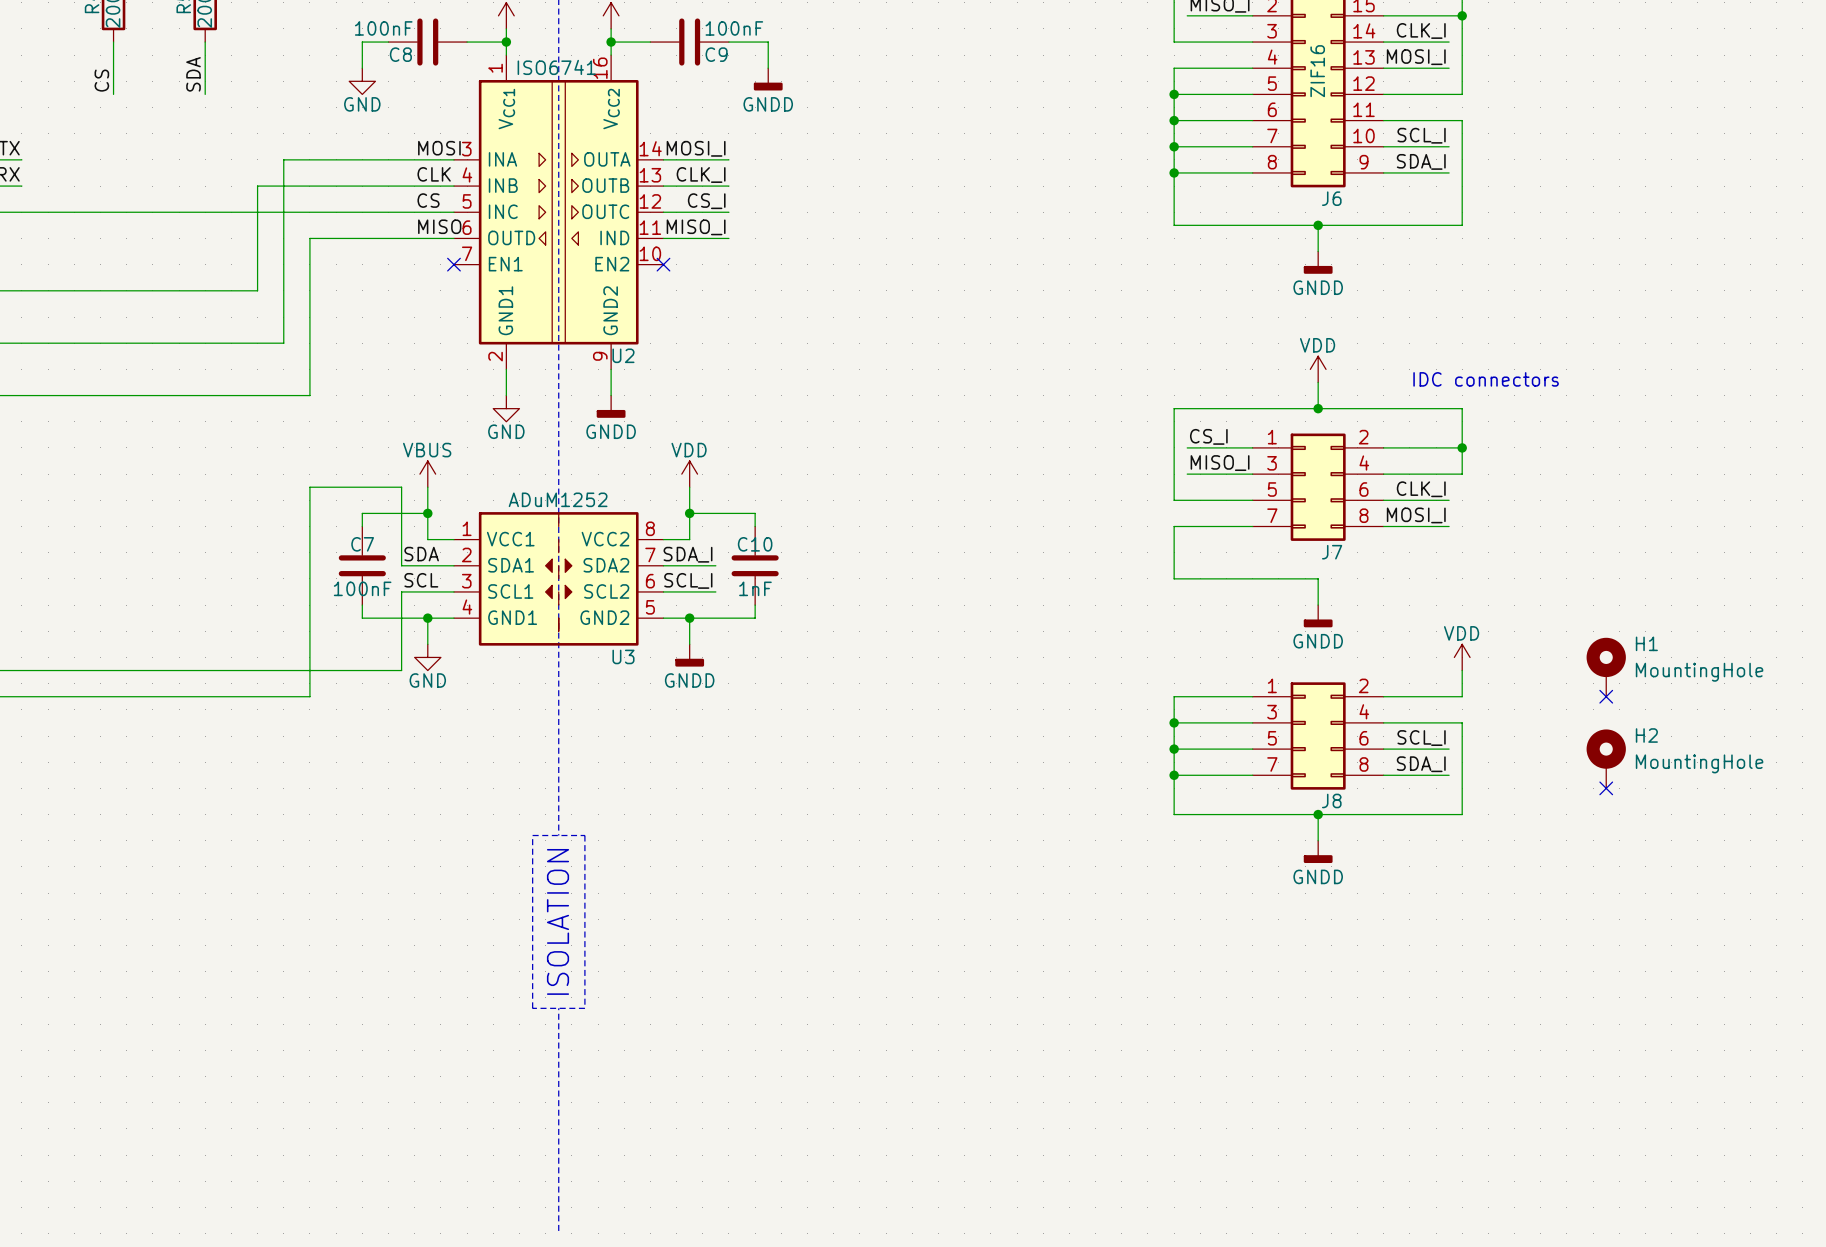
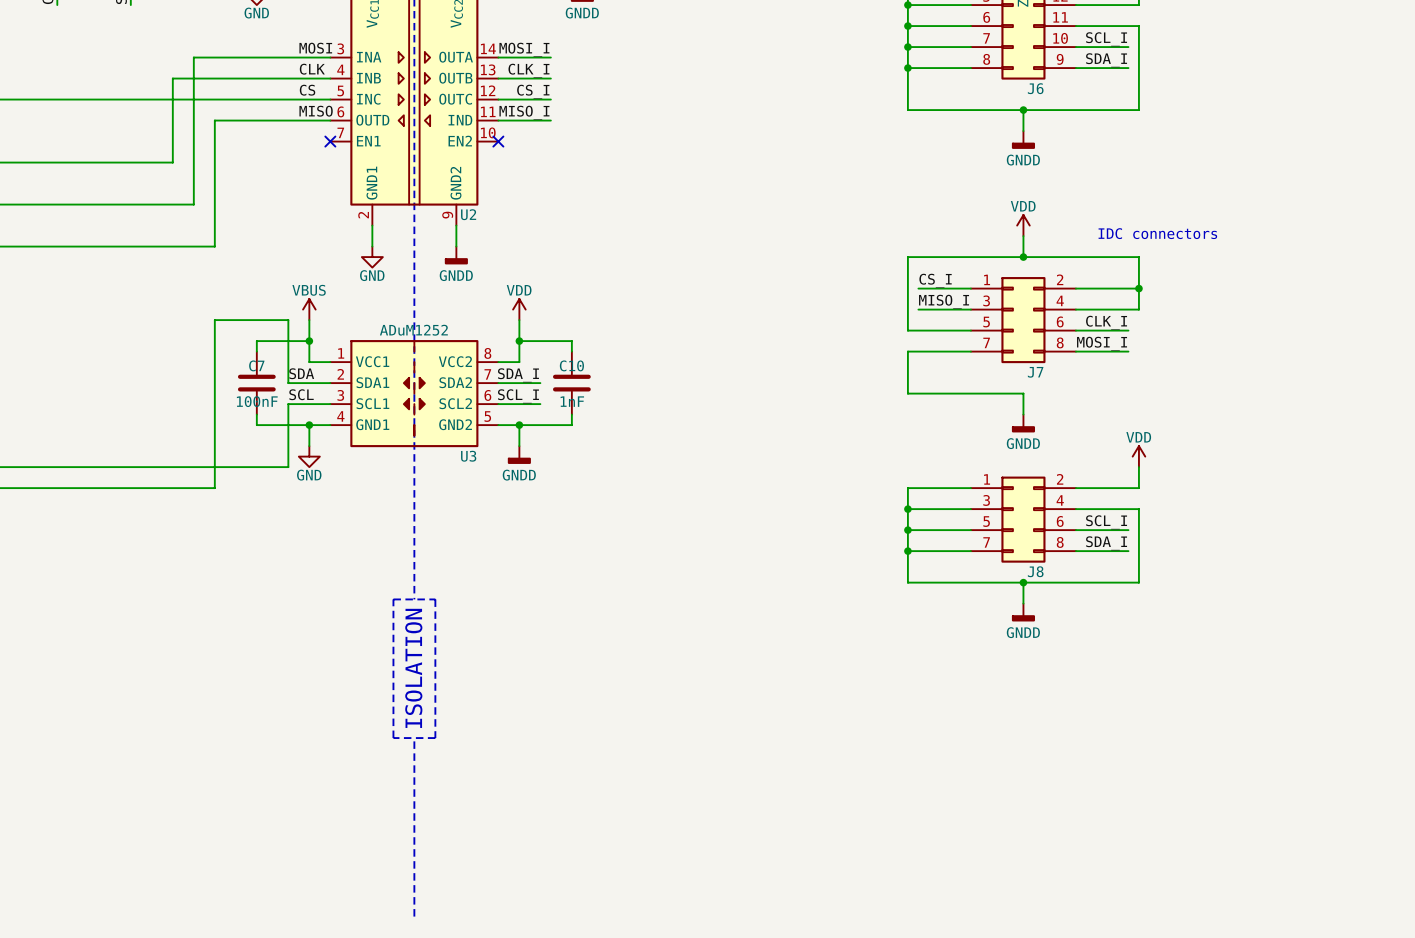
H1: MountingHole (1606, 667) -> none
no-connect mark: (1606, 696) -> none
H2: MountingHole (1606, 758) -> none
no-connect mark: (1606, 788) -> none

